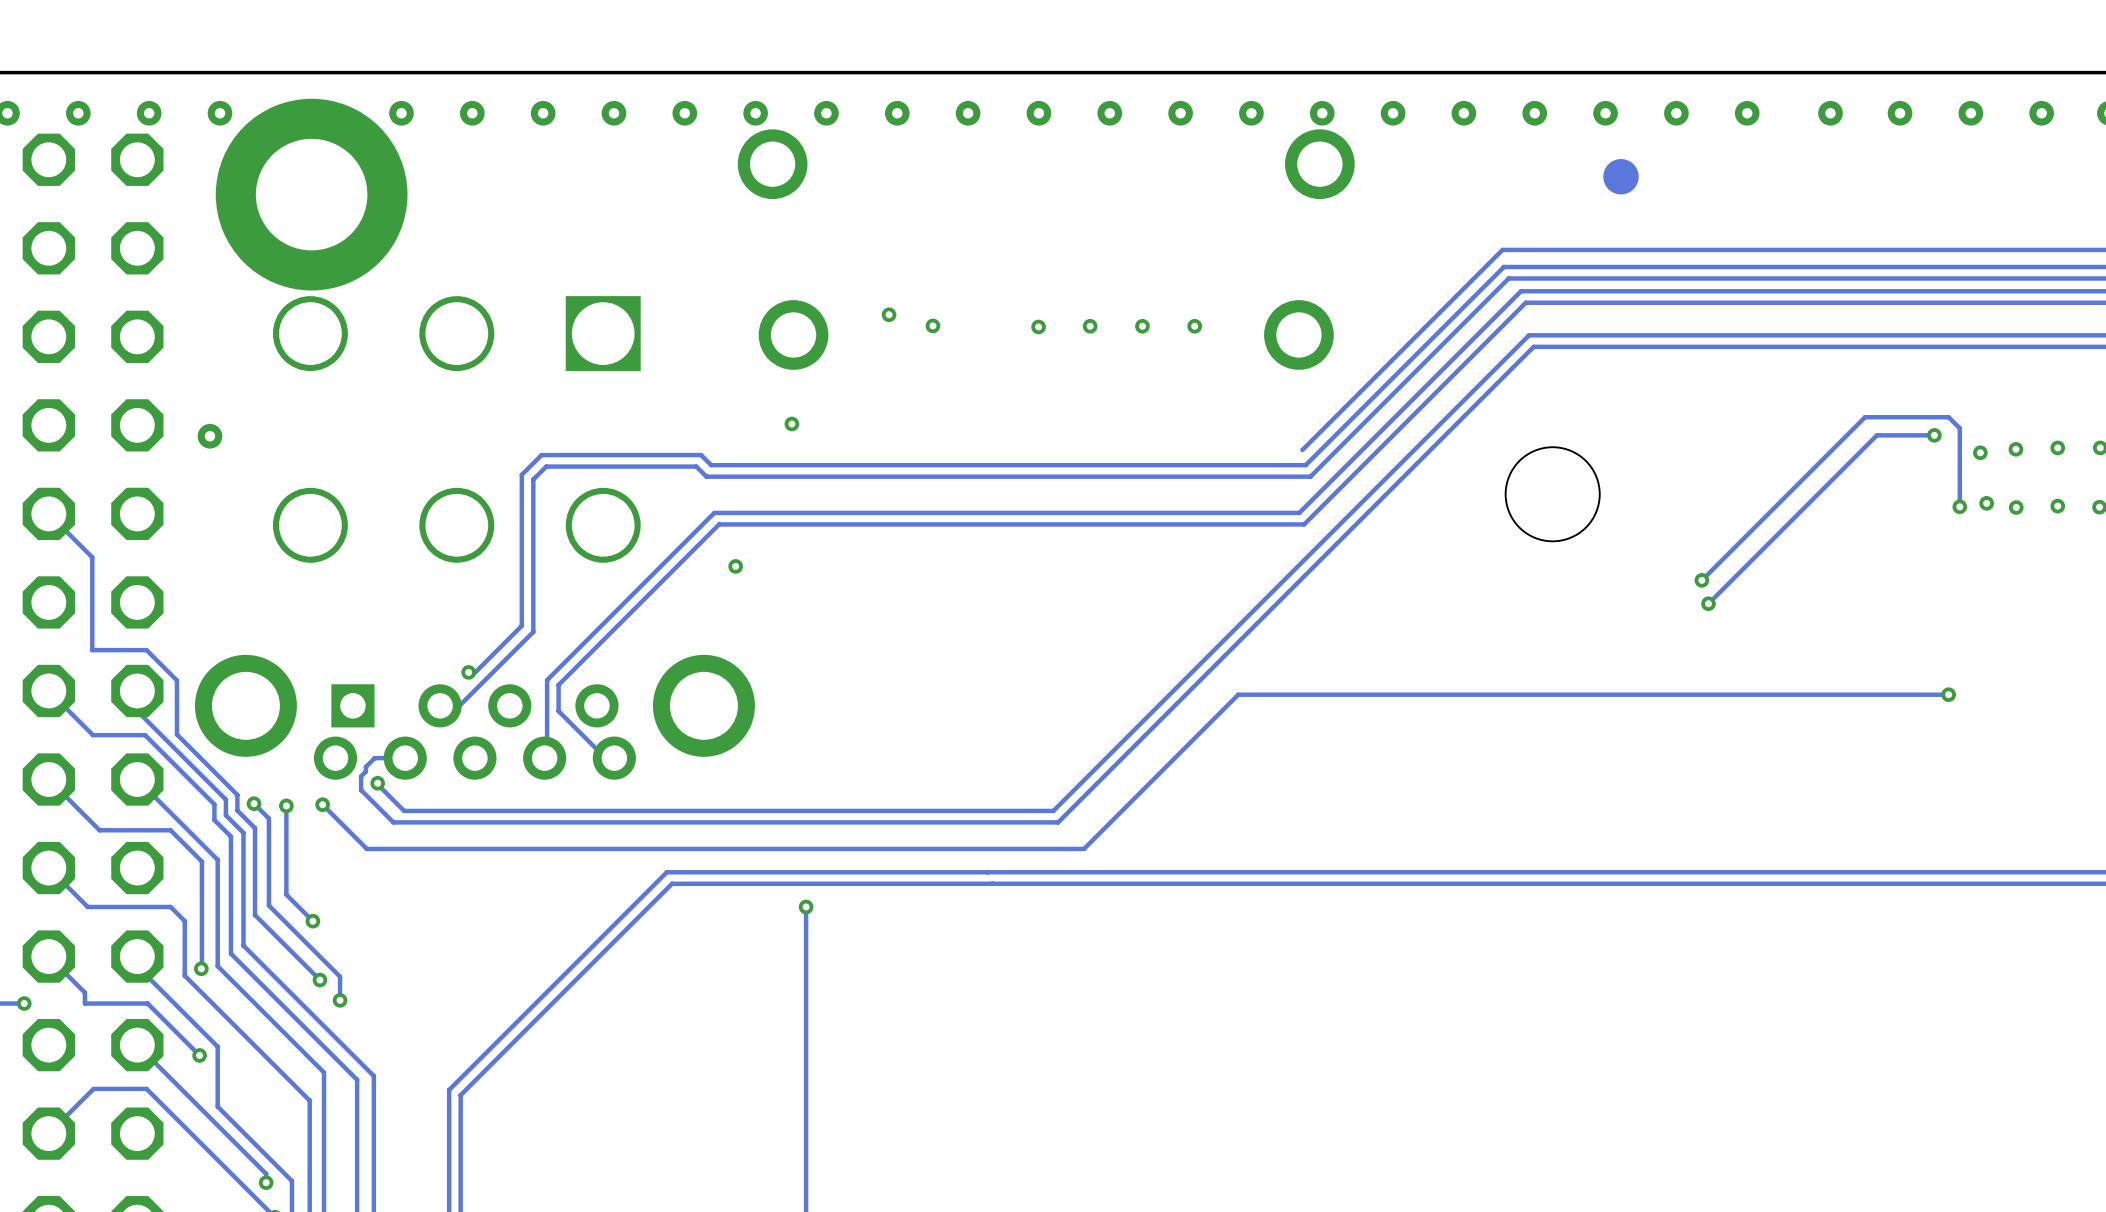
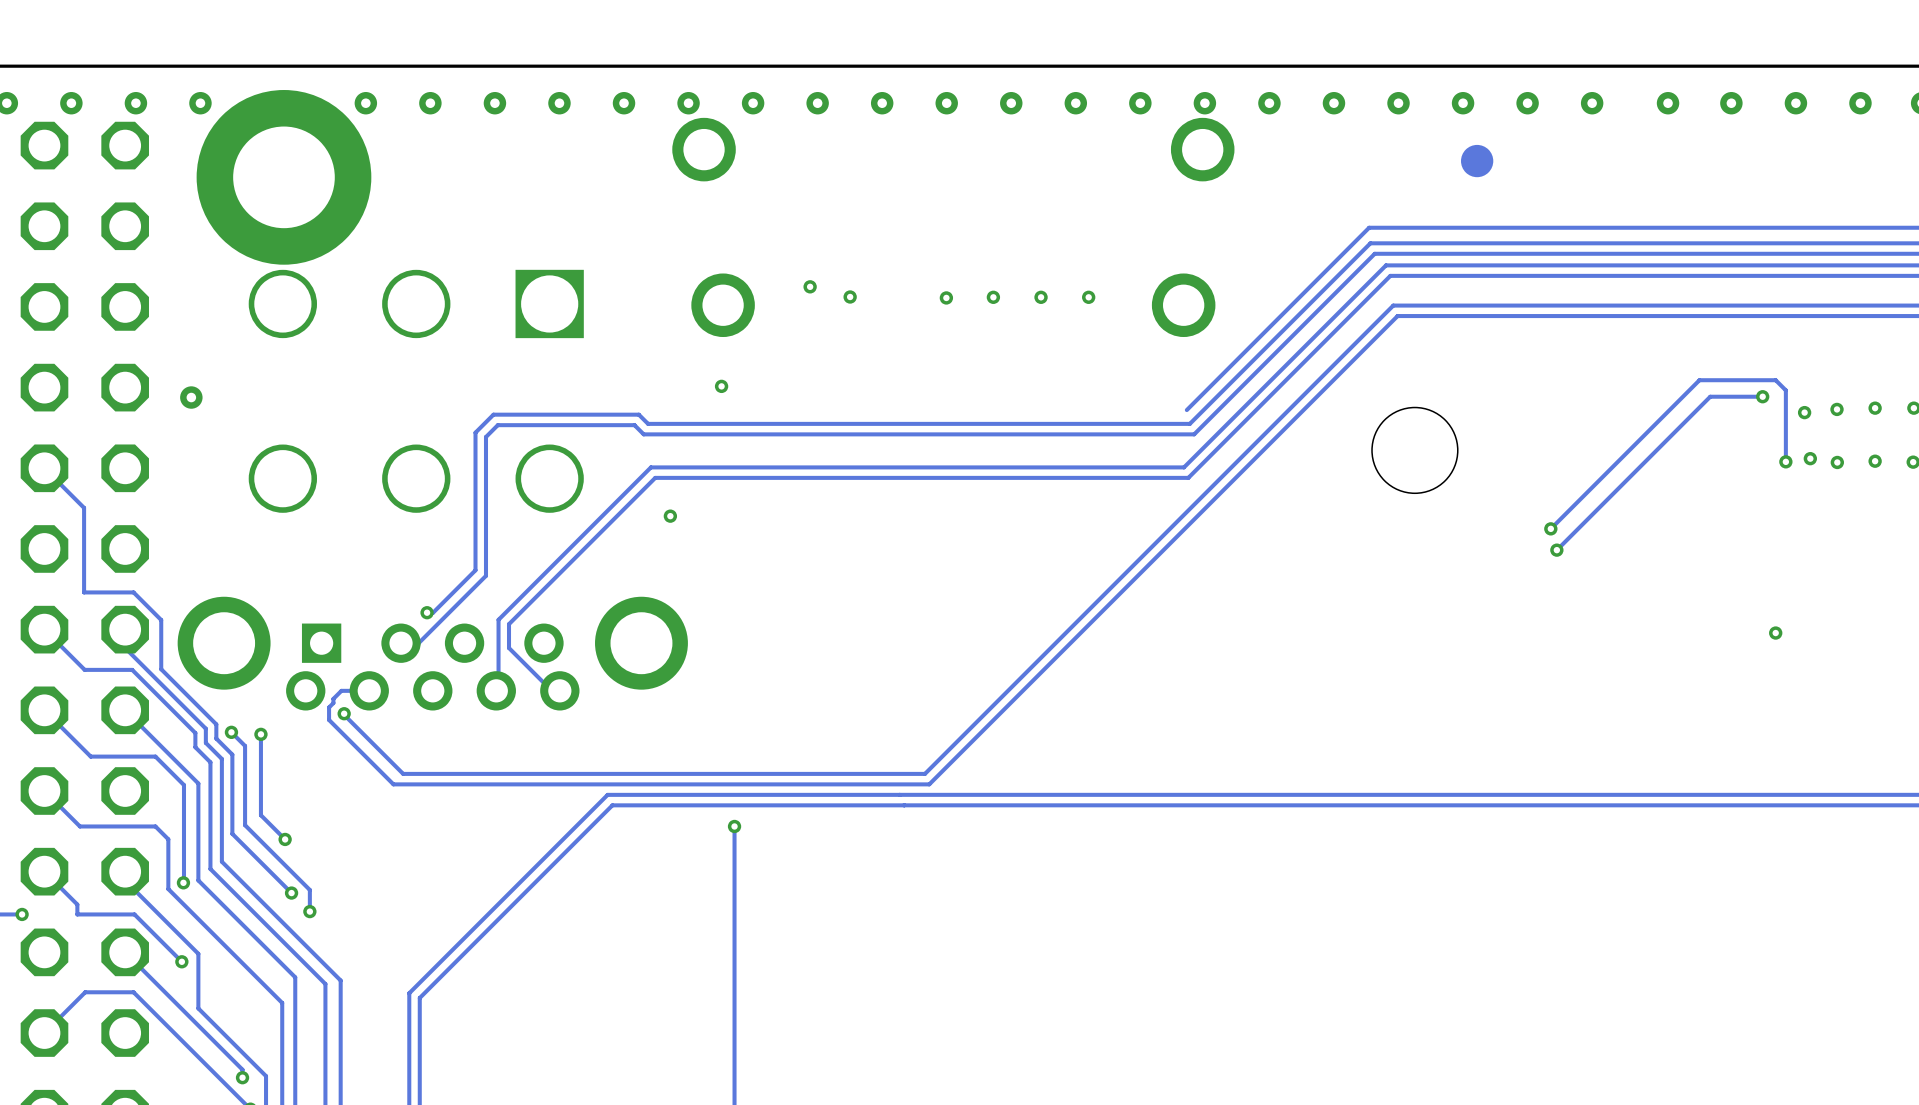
track: (1948, 694) (1238, 694) (1084, 848) (1015, 849) -> none
track: (322, 804) (366, 848) (442, 849) -> (368, 738) (403, 773)
via: (322, 804) -> none
track: (1053, 810) (404, 810) -> (959, 738) (924, 773)
track: (1058, 822) (393, 822) -> (964, 749) (929, 784) (393, 784) (358, 749)

